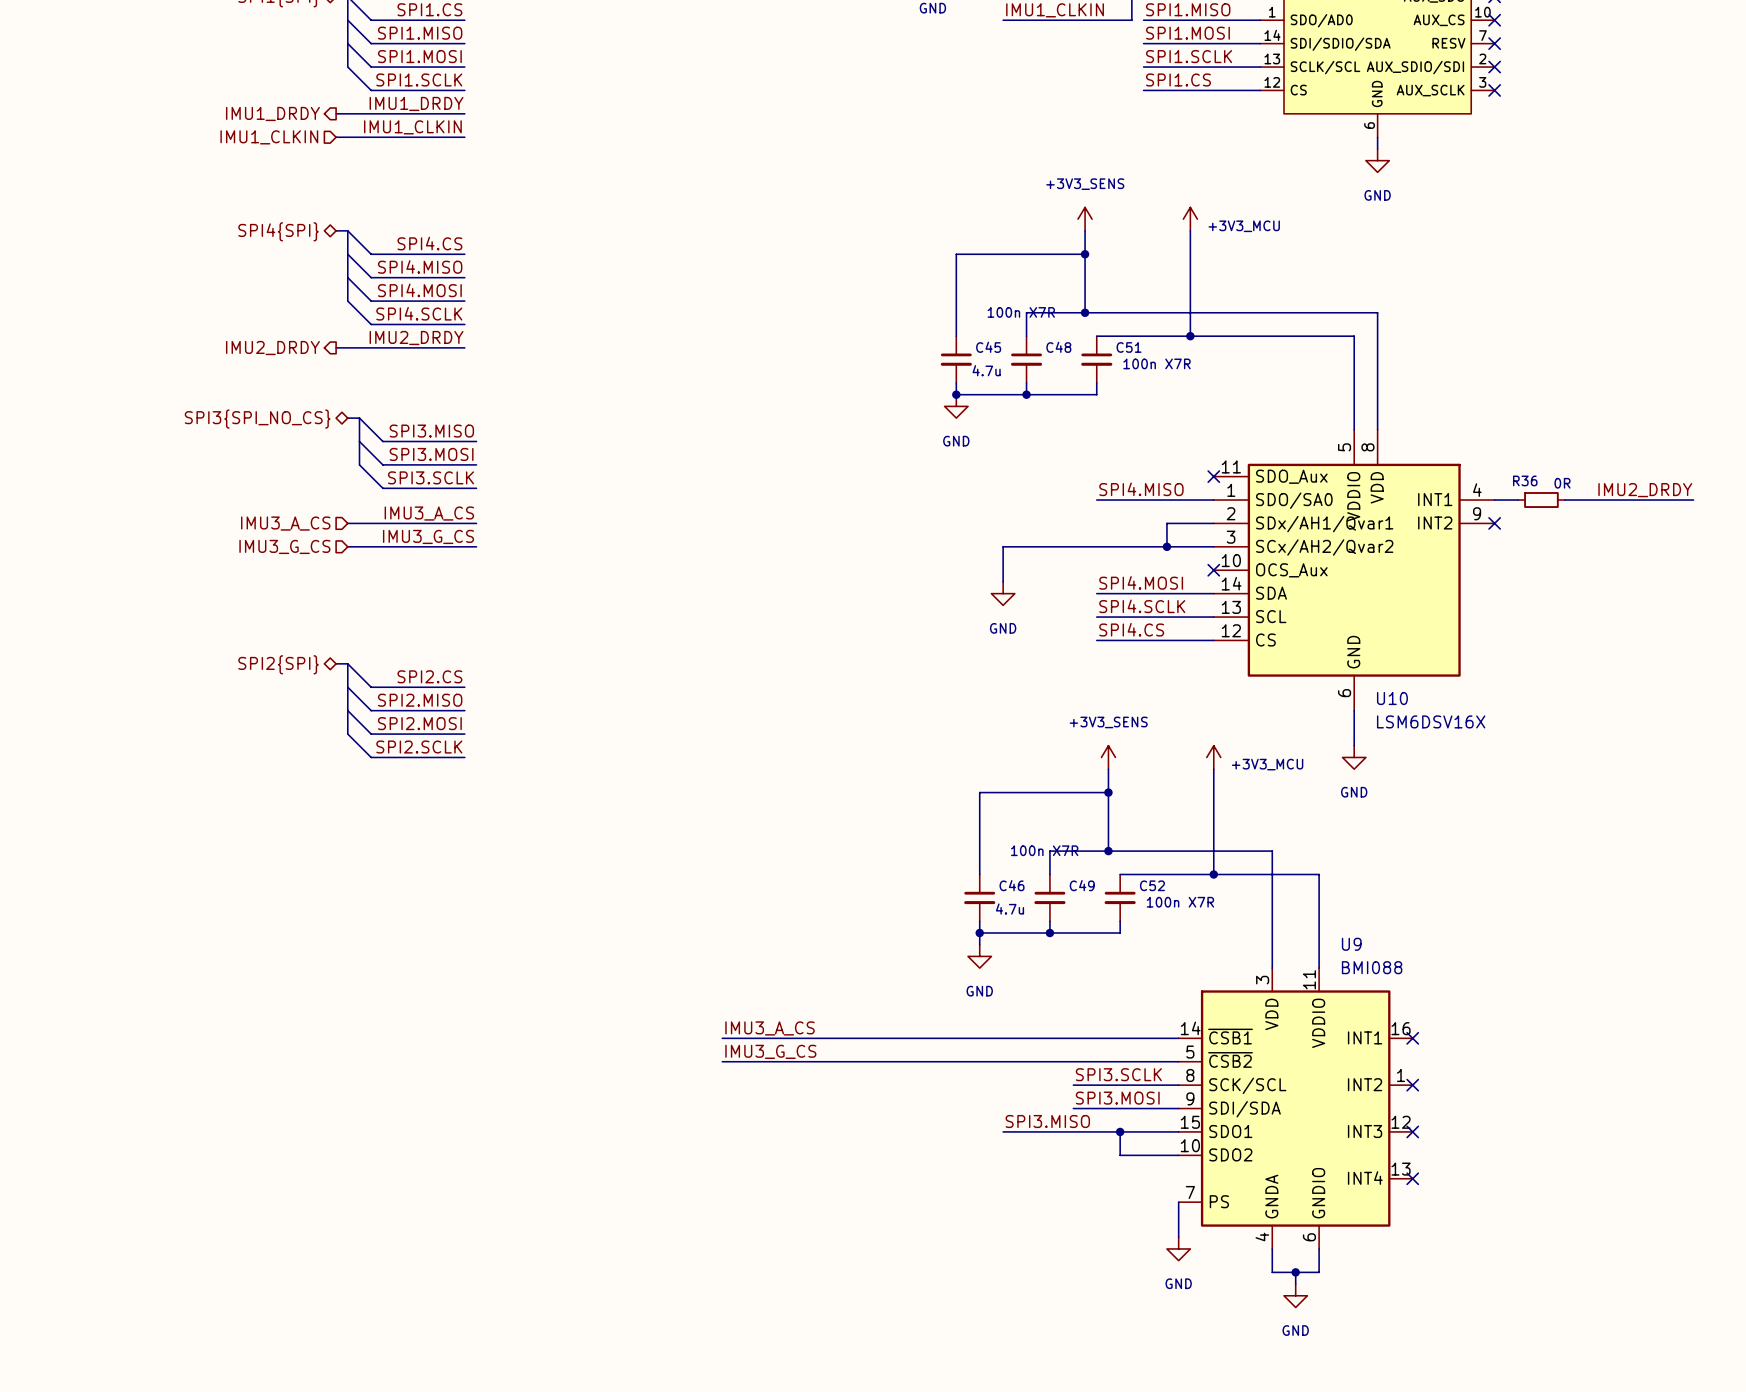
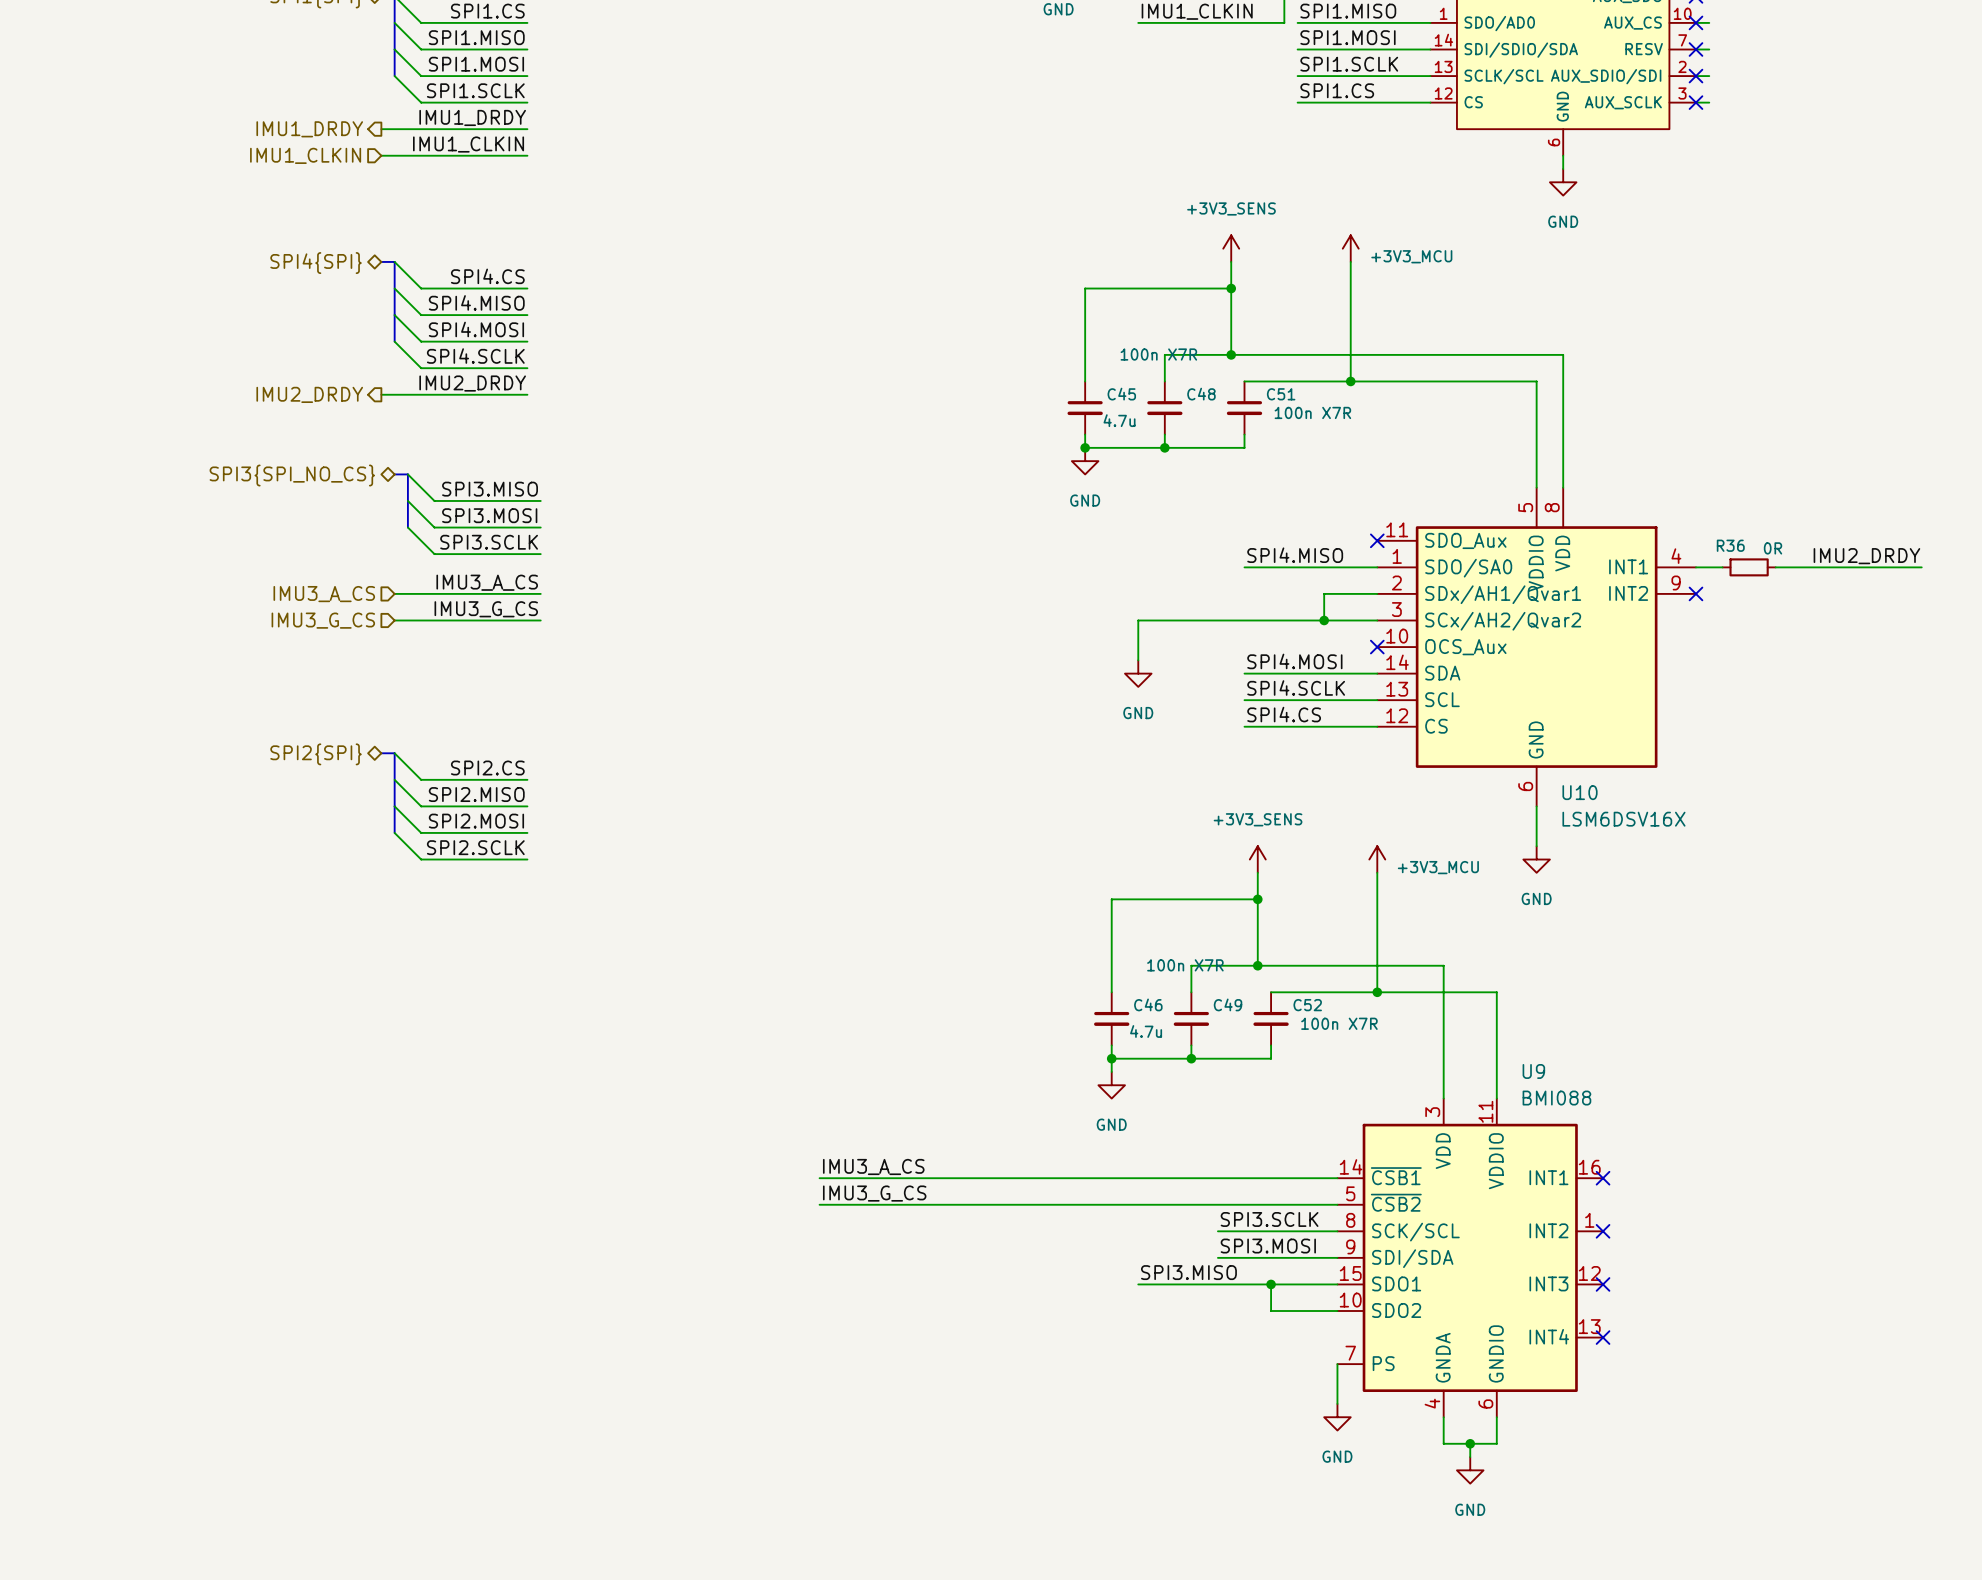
wire: none -> (1695, 22) (1709, 22)
wire: none -> (1695, 49) (1709, 49)
wire: none -> (1695, 76) (1709, 76)
wire: none -> (1695, 102) (1709, 102)

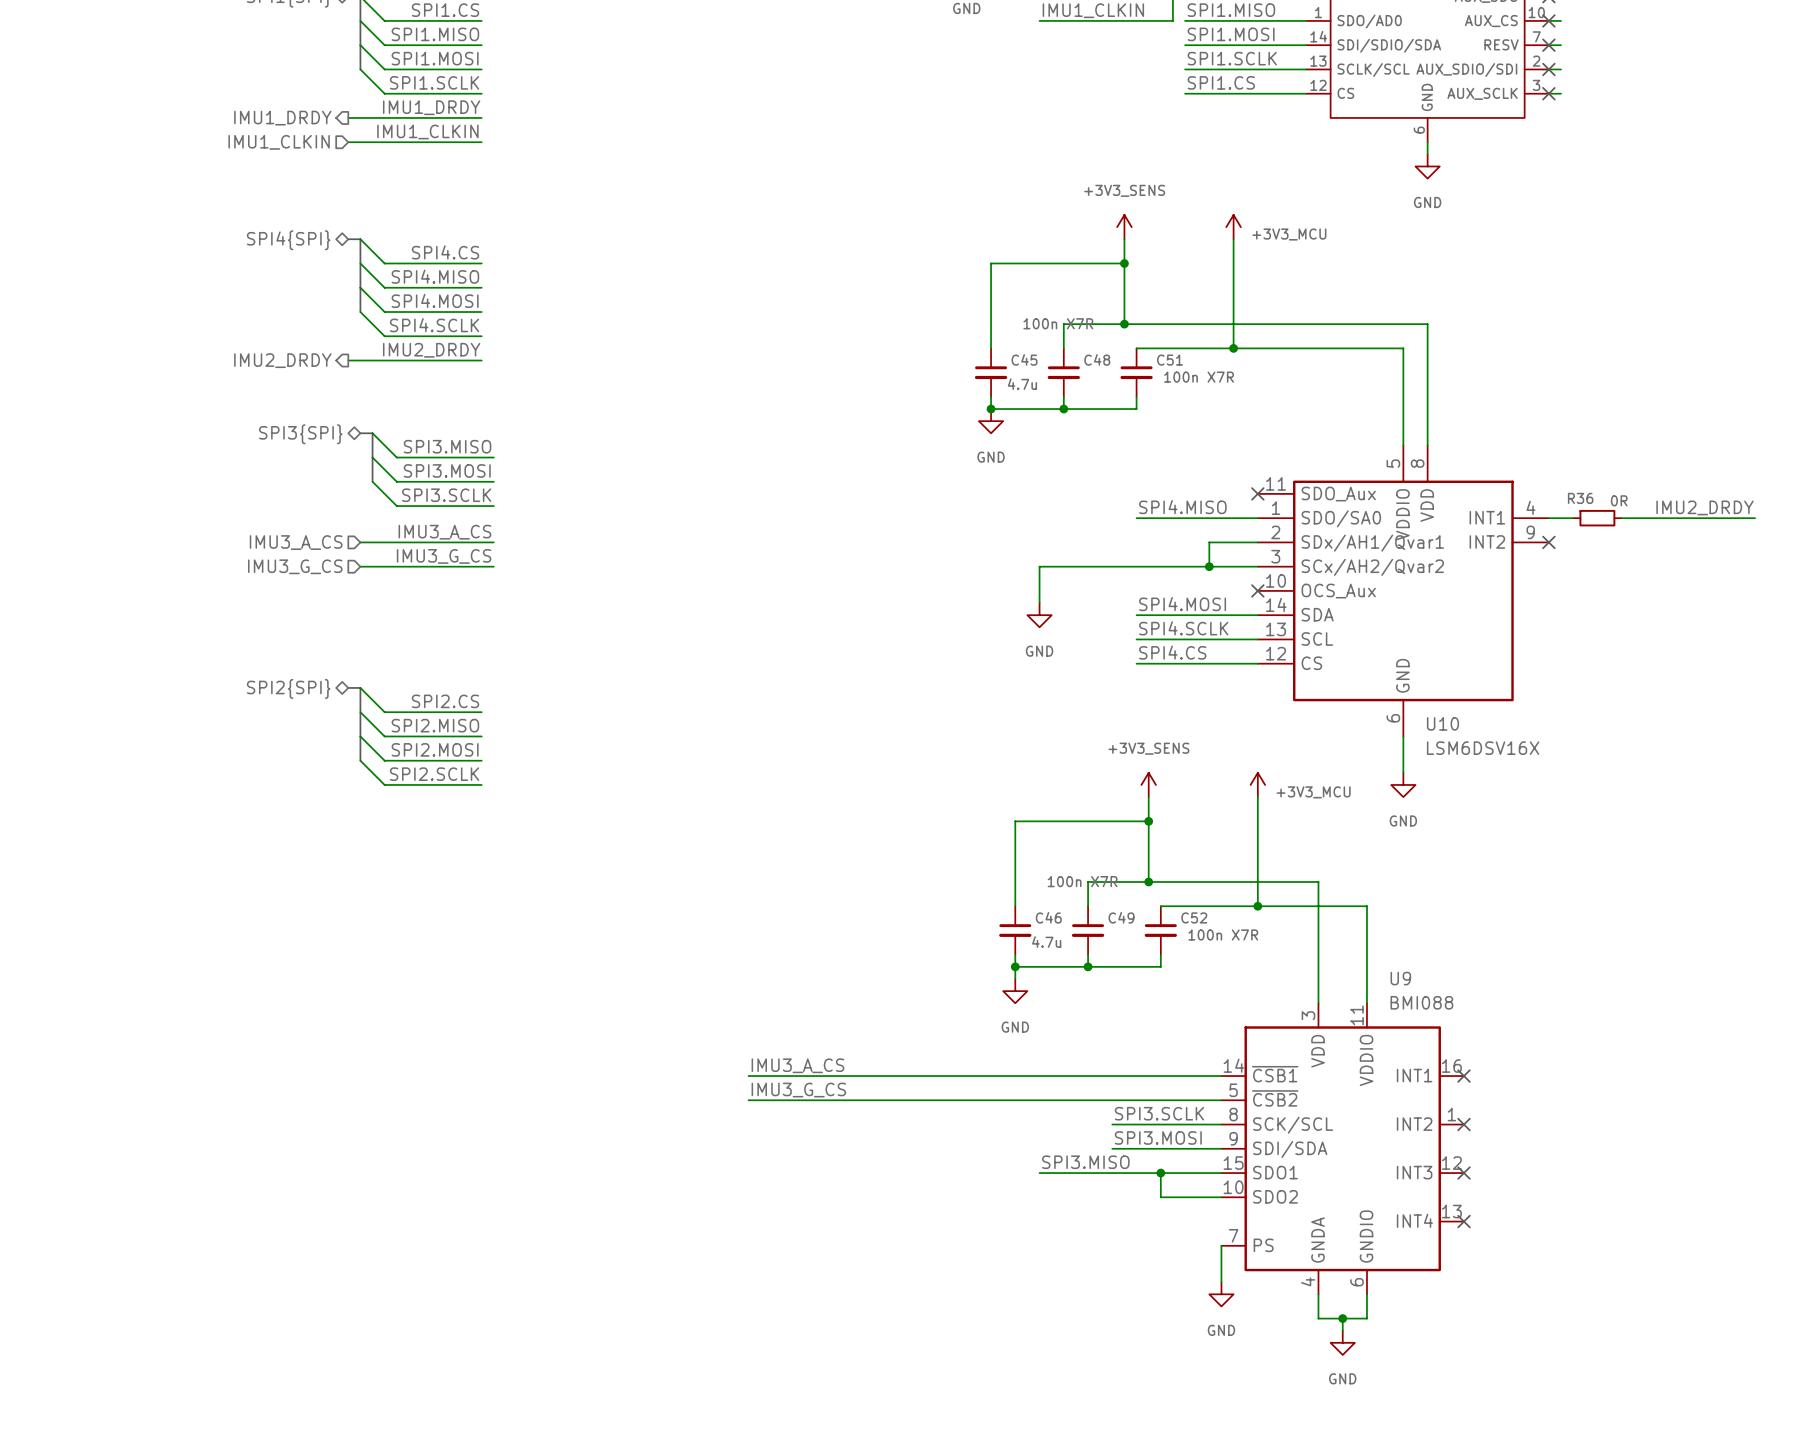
hierarchical label: SPI3{SPI_NO_CS} (292, 475) -> SPI3{SPI} (300, 434)

